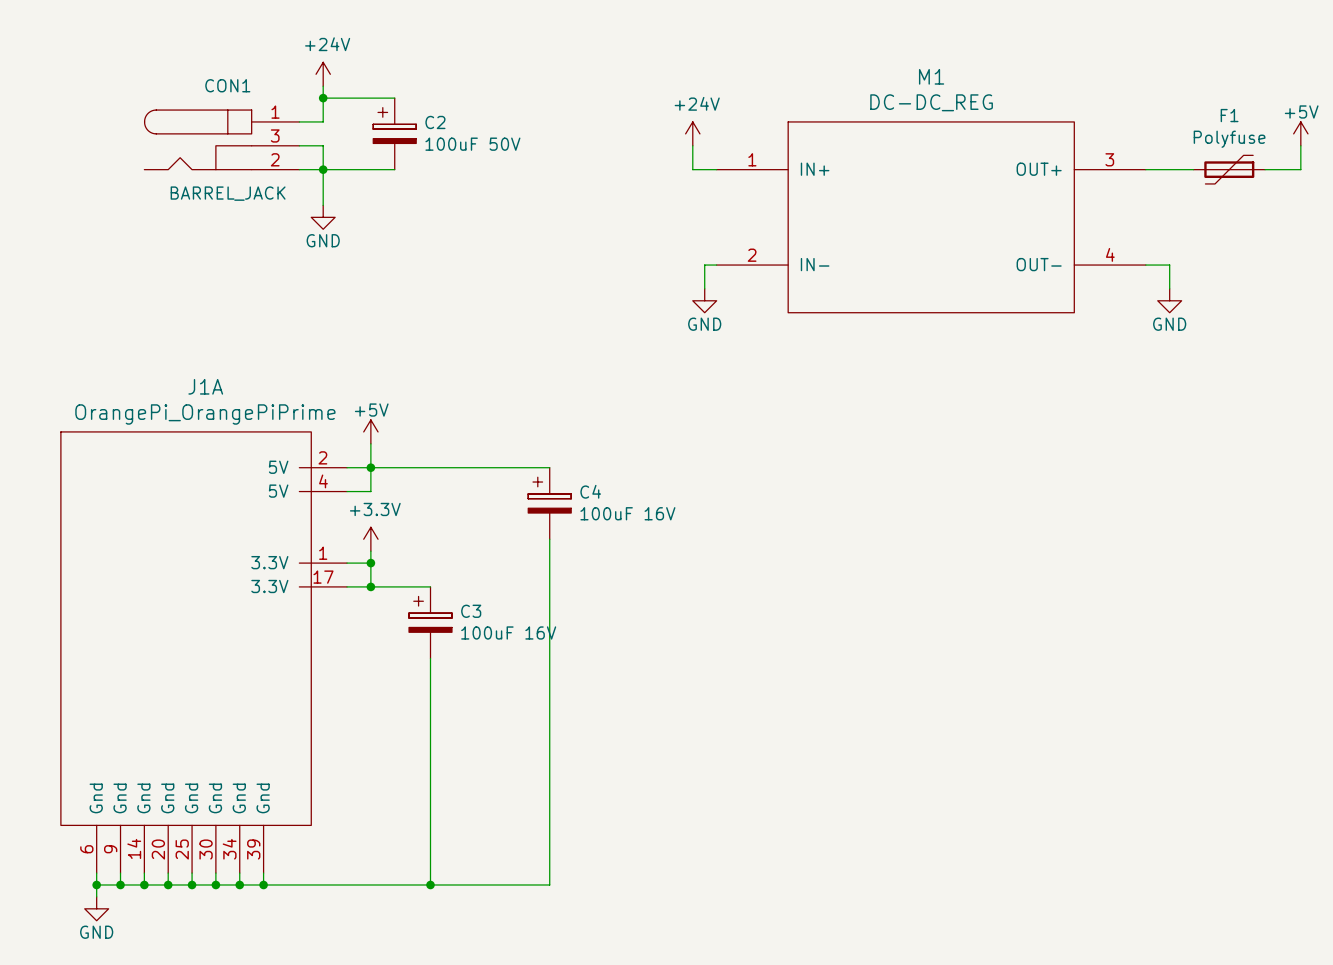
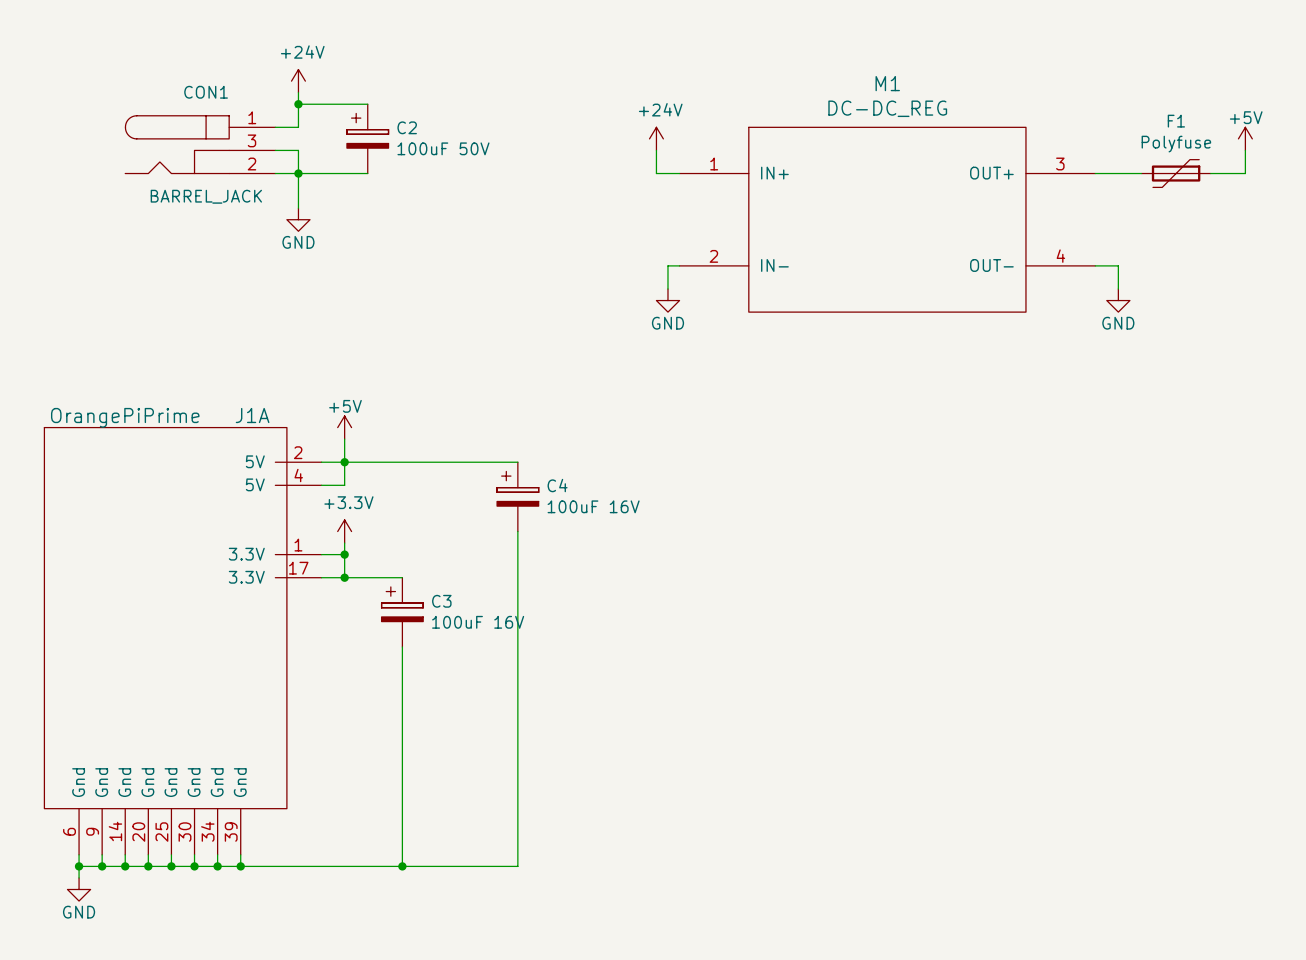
J1A name position: J1A (205, 386) -> J1A (252, 415)
J1A value: OrangePi_OrangePiPrime (205, 414) -> OrangePiPrime (125, 417)

